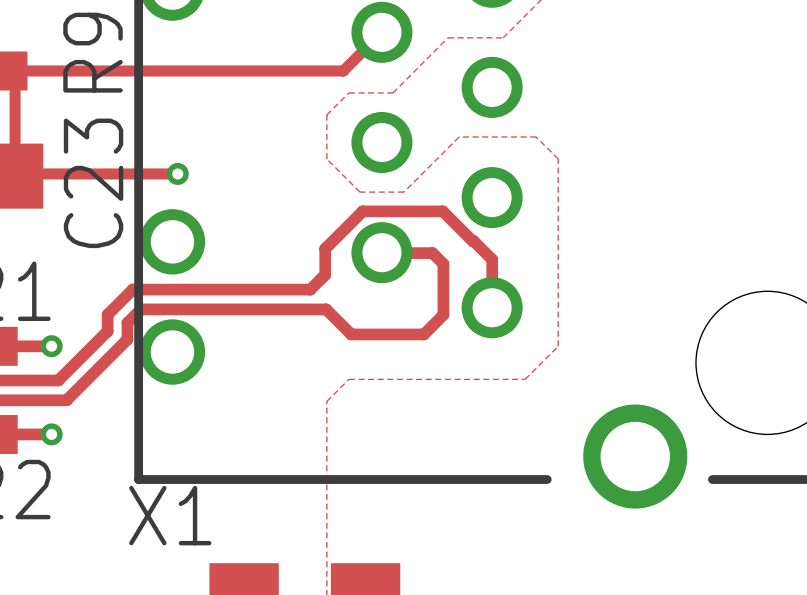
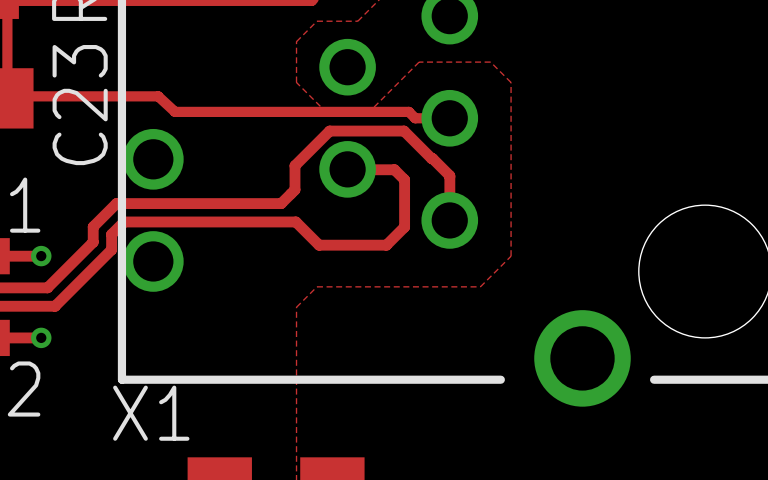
track: none -> (158, 96) (175, 111) (408, 111) (415, 118) (449, 118)
via: (177, 173) -> none

